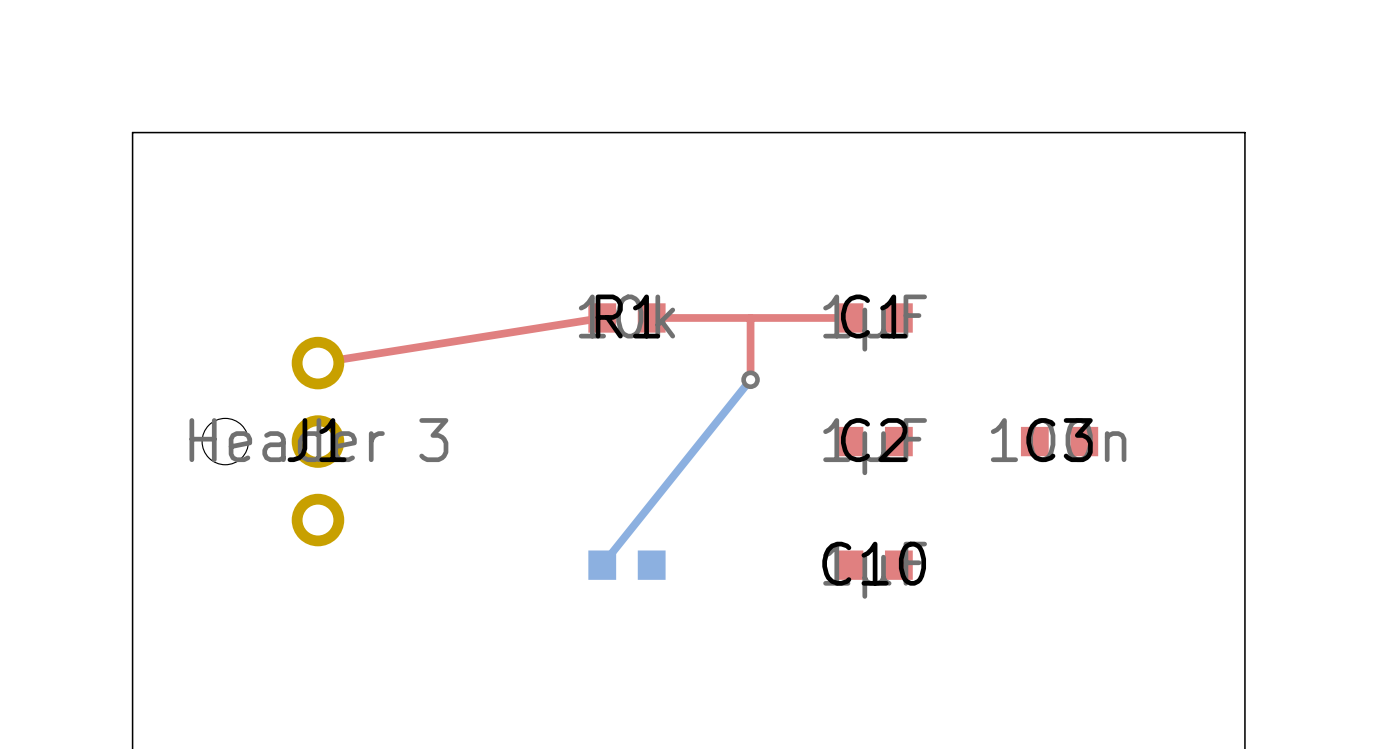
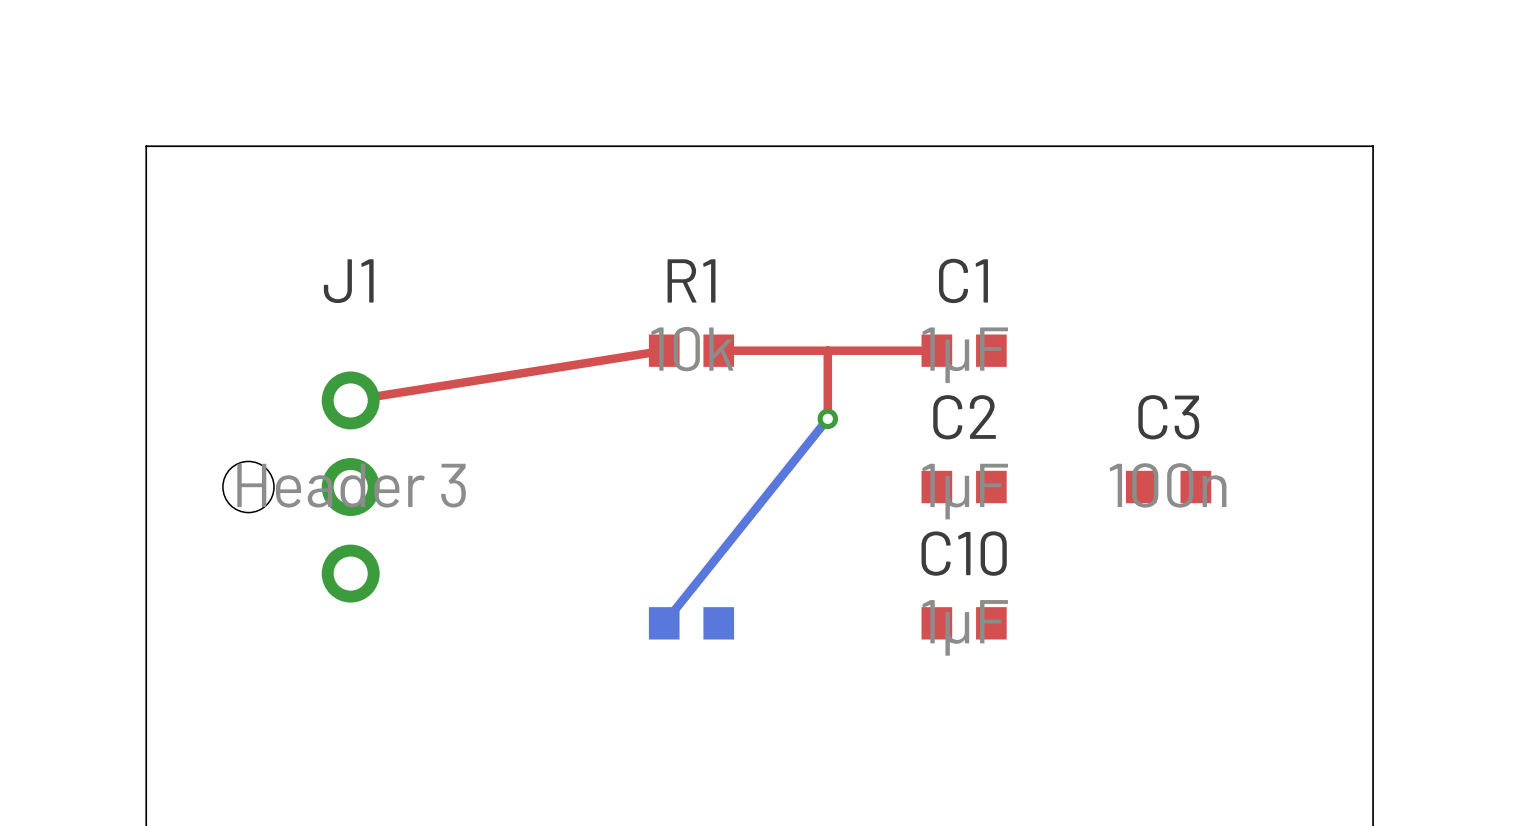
R1 name position: R1 (627, 316) -> R1 (691, 280)
C1 name position: C1 (874, 316) -> C1 (963, 280)
J1 name position: J1 (317, 440) -> J1 (348, 281)
C2 name position: C2 (874, 440) -> C2 (964, 417)
C3 name position: C3 (1059, 440) -> C3 (1168, 417)
C10 name position: C10 (874, 563) -> C10 (964, 553)

